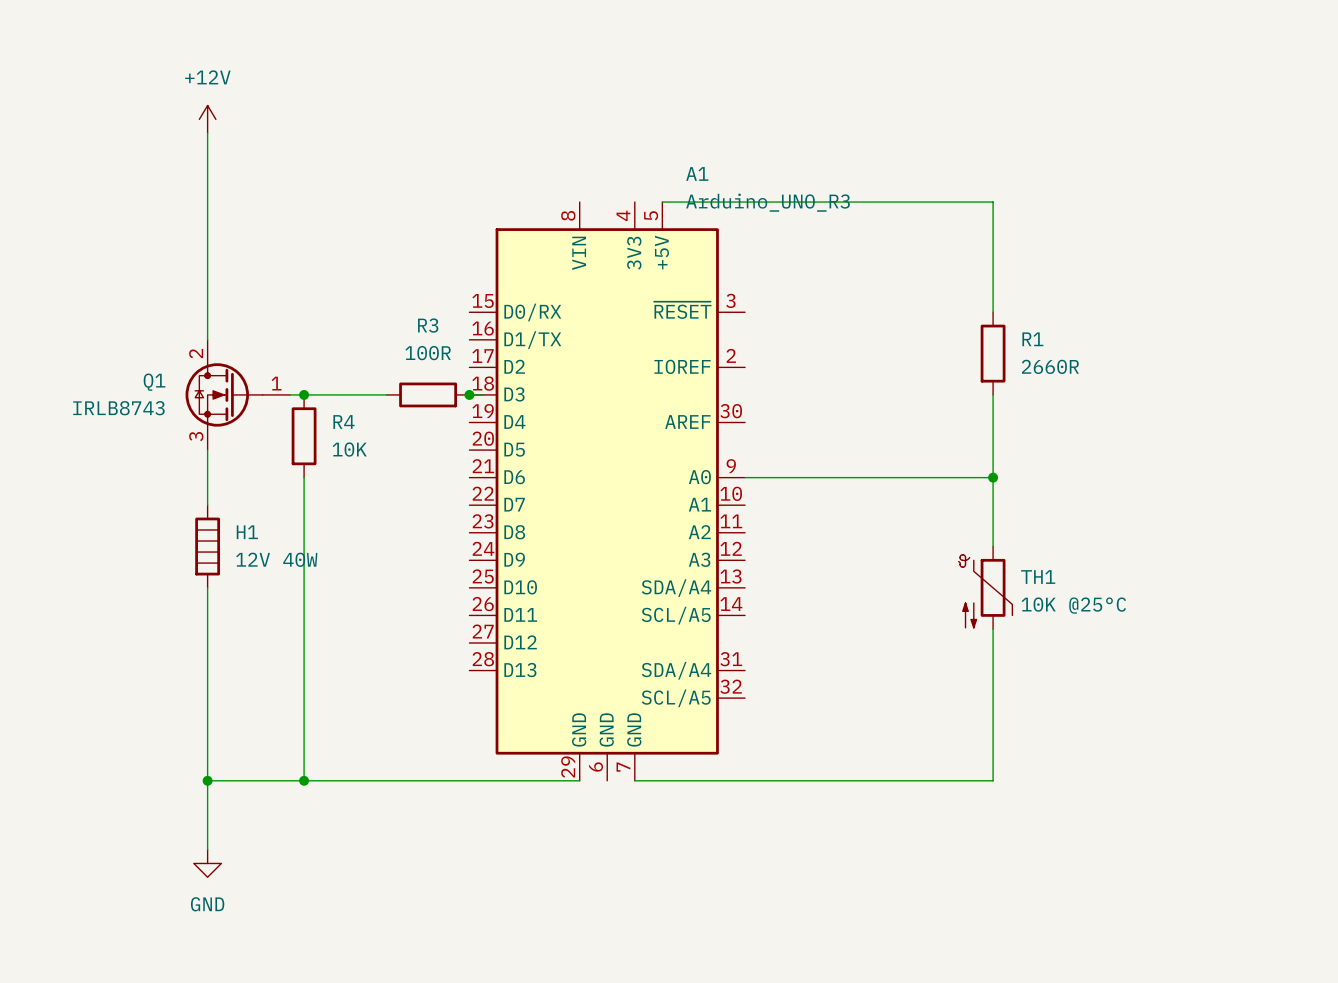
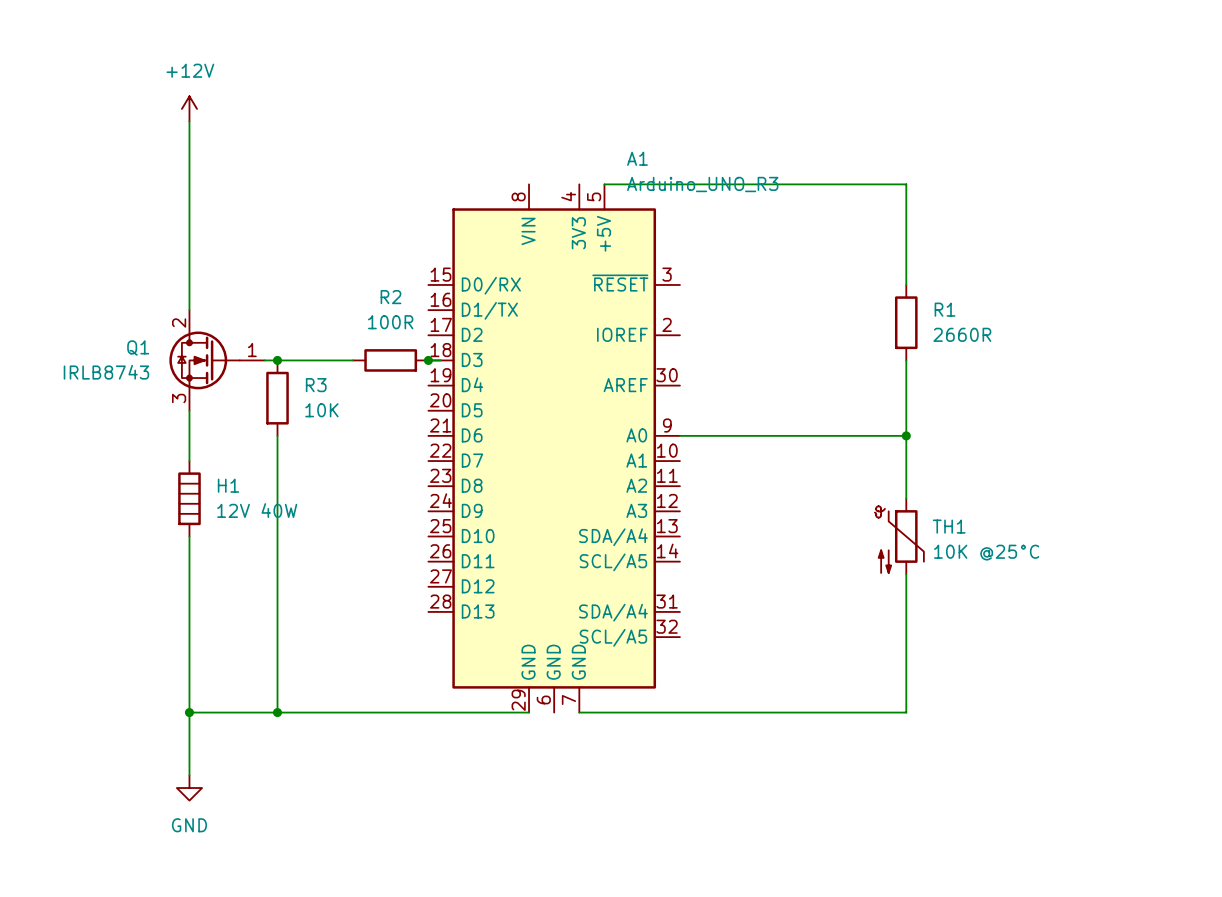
R3 name: R3 (428, 325) -> R2 (390, 297)
R4 name: R4 (343, 421) -> R3 (316, 385)

